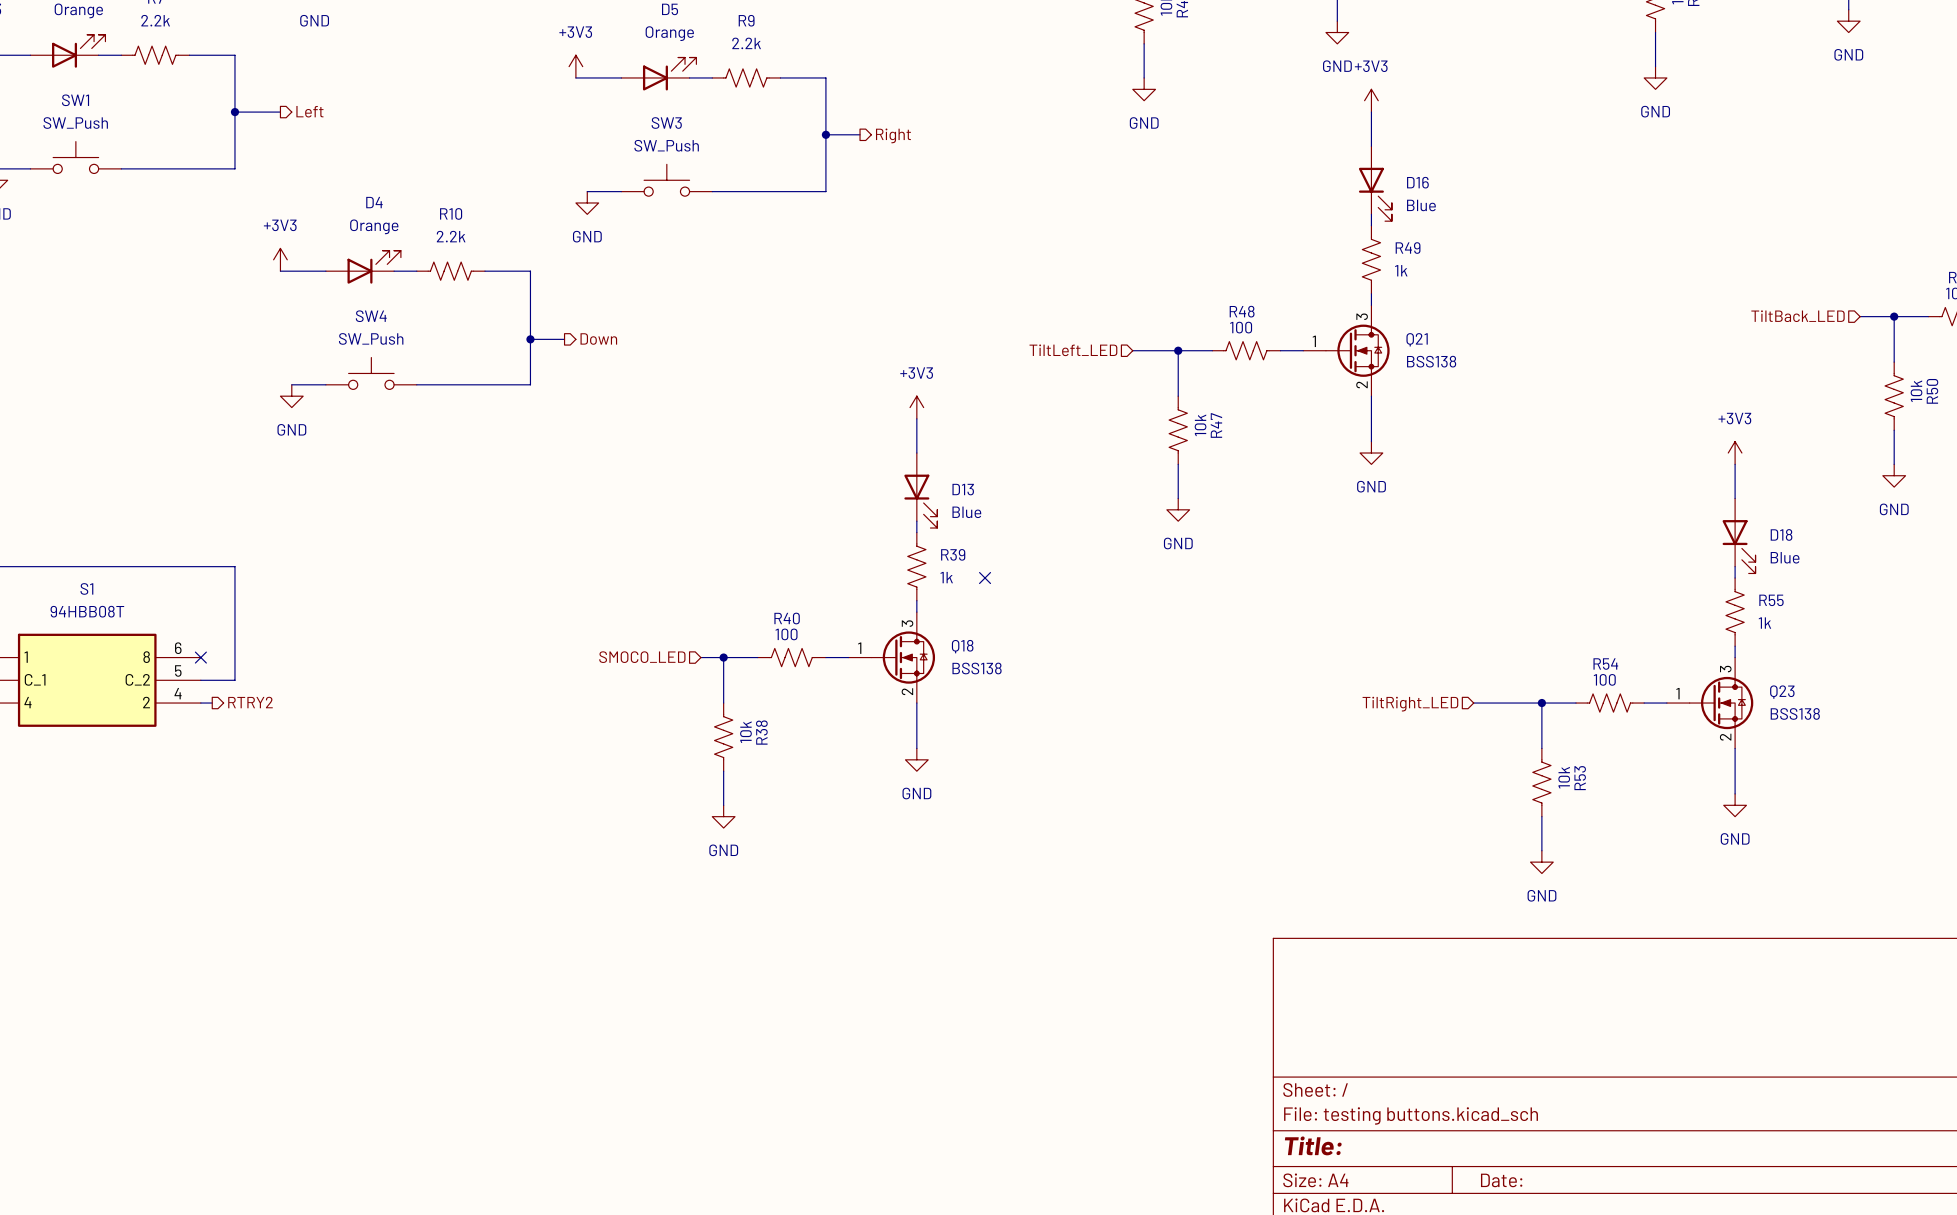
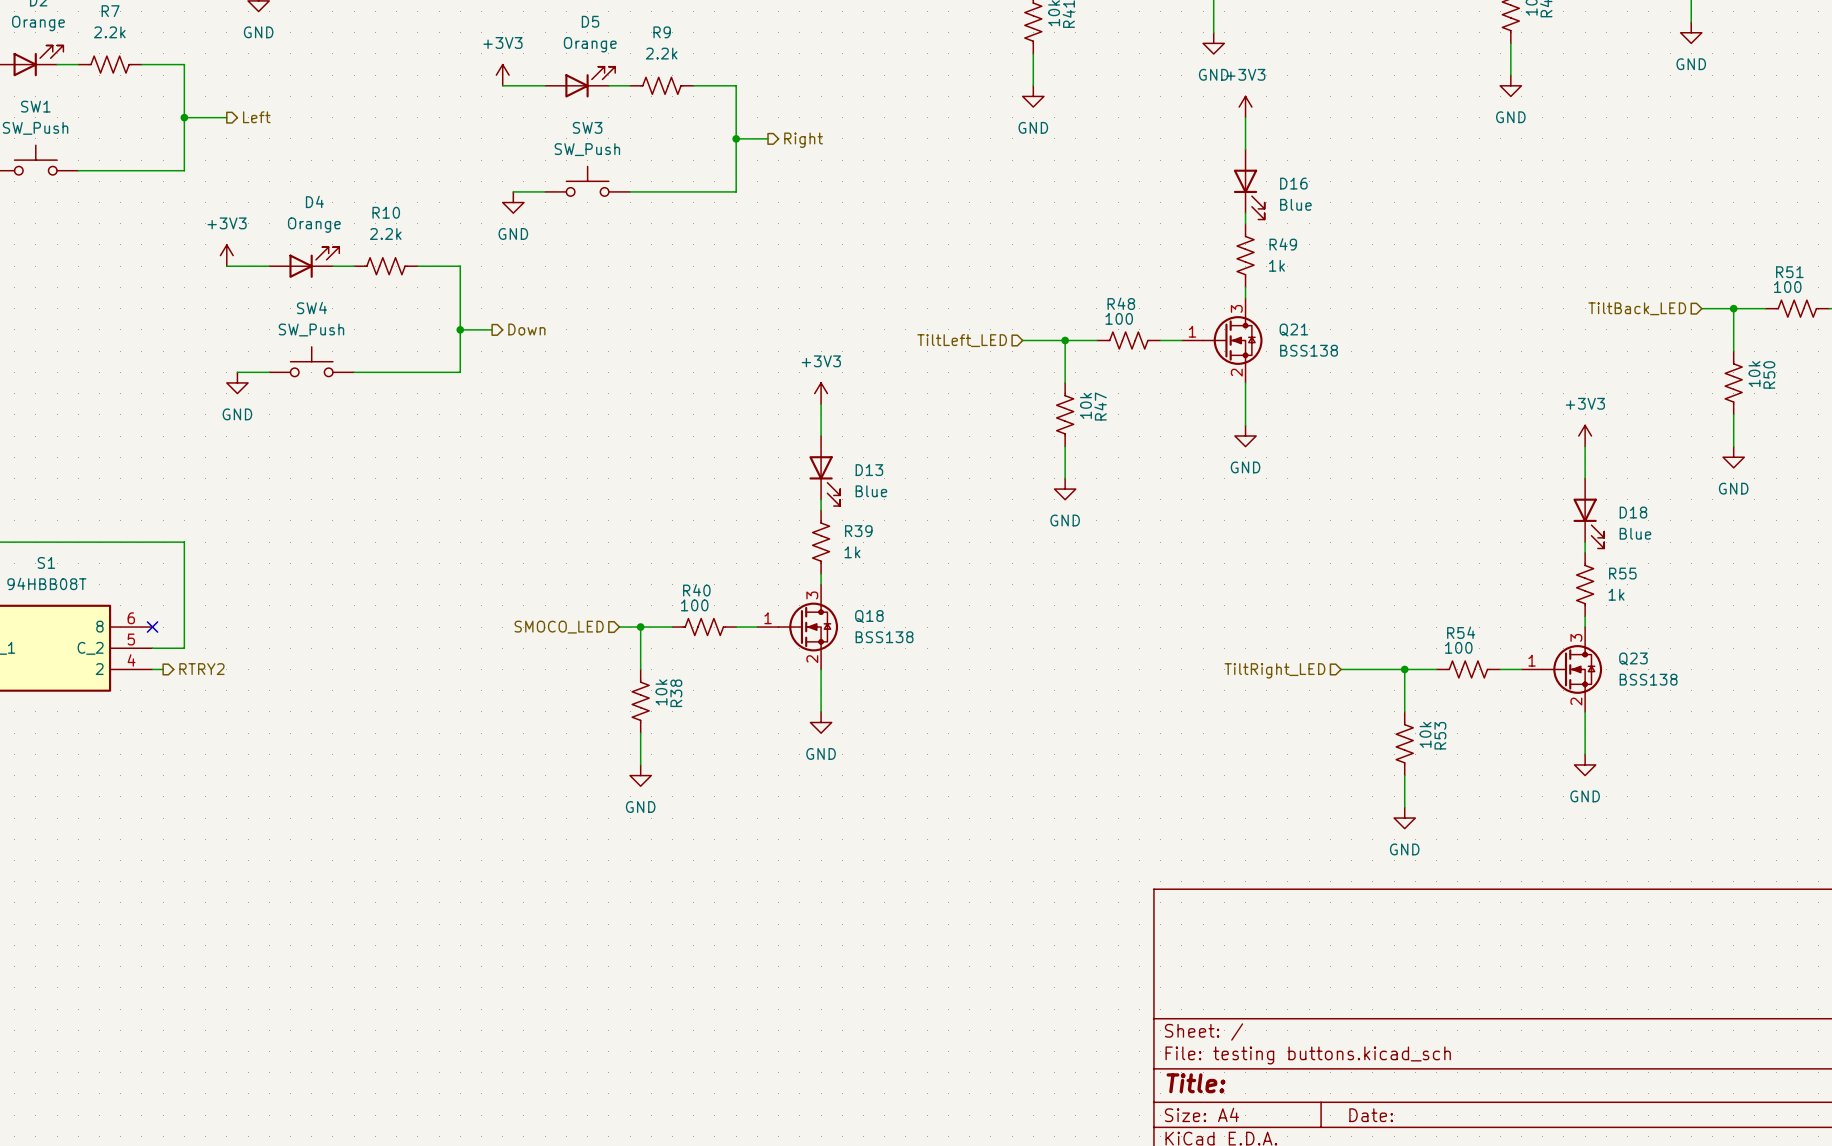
no-connect mark: (985, 578) -> none

